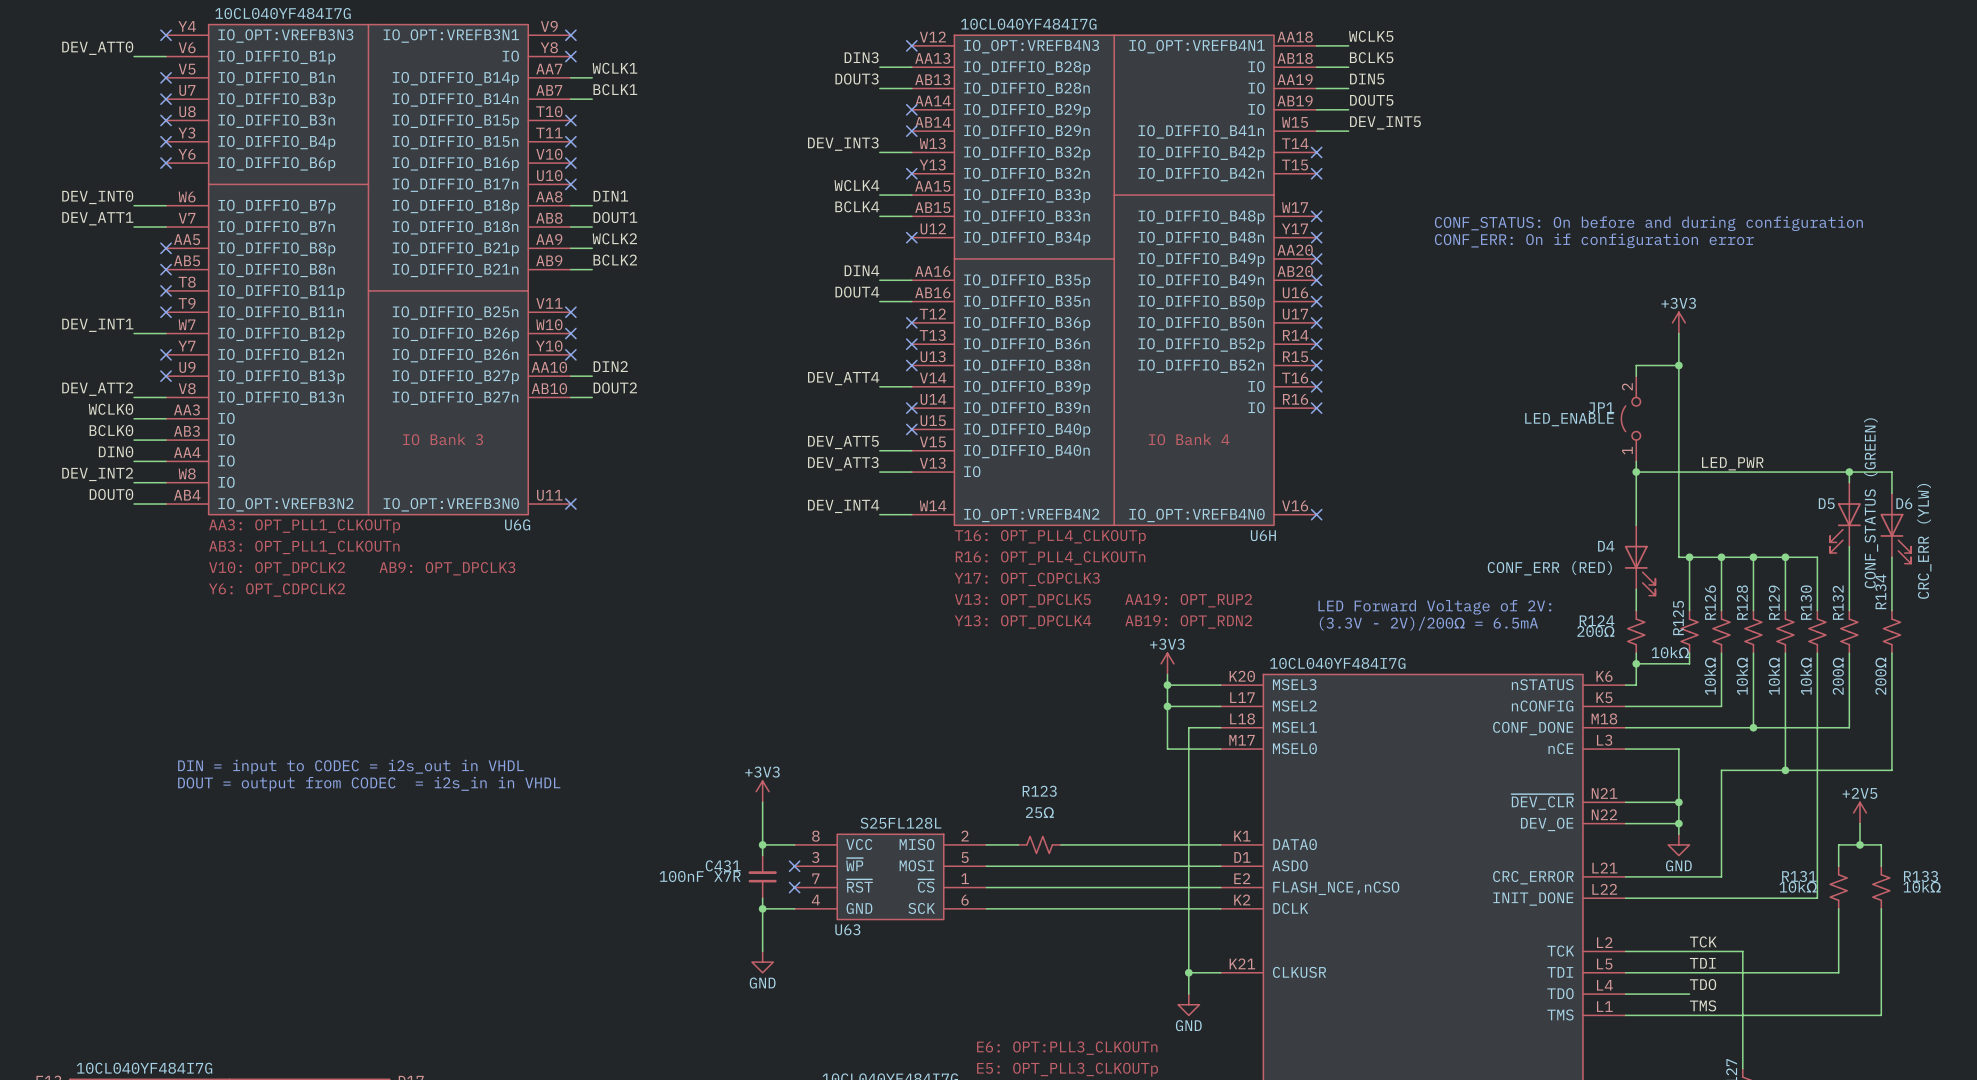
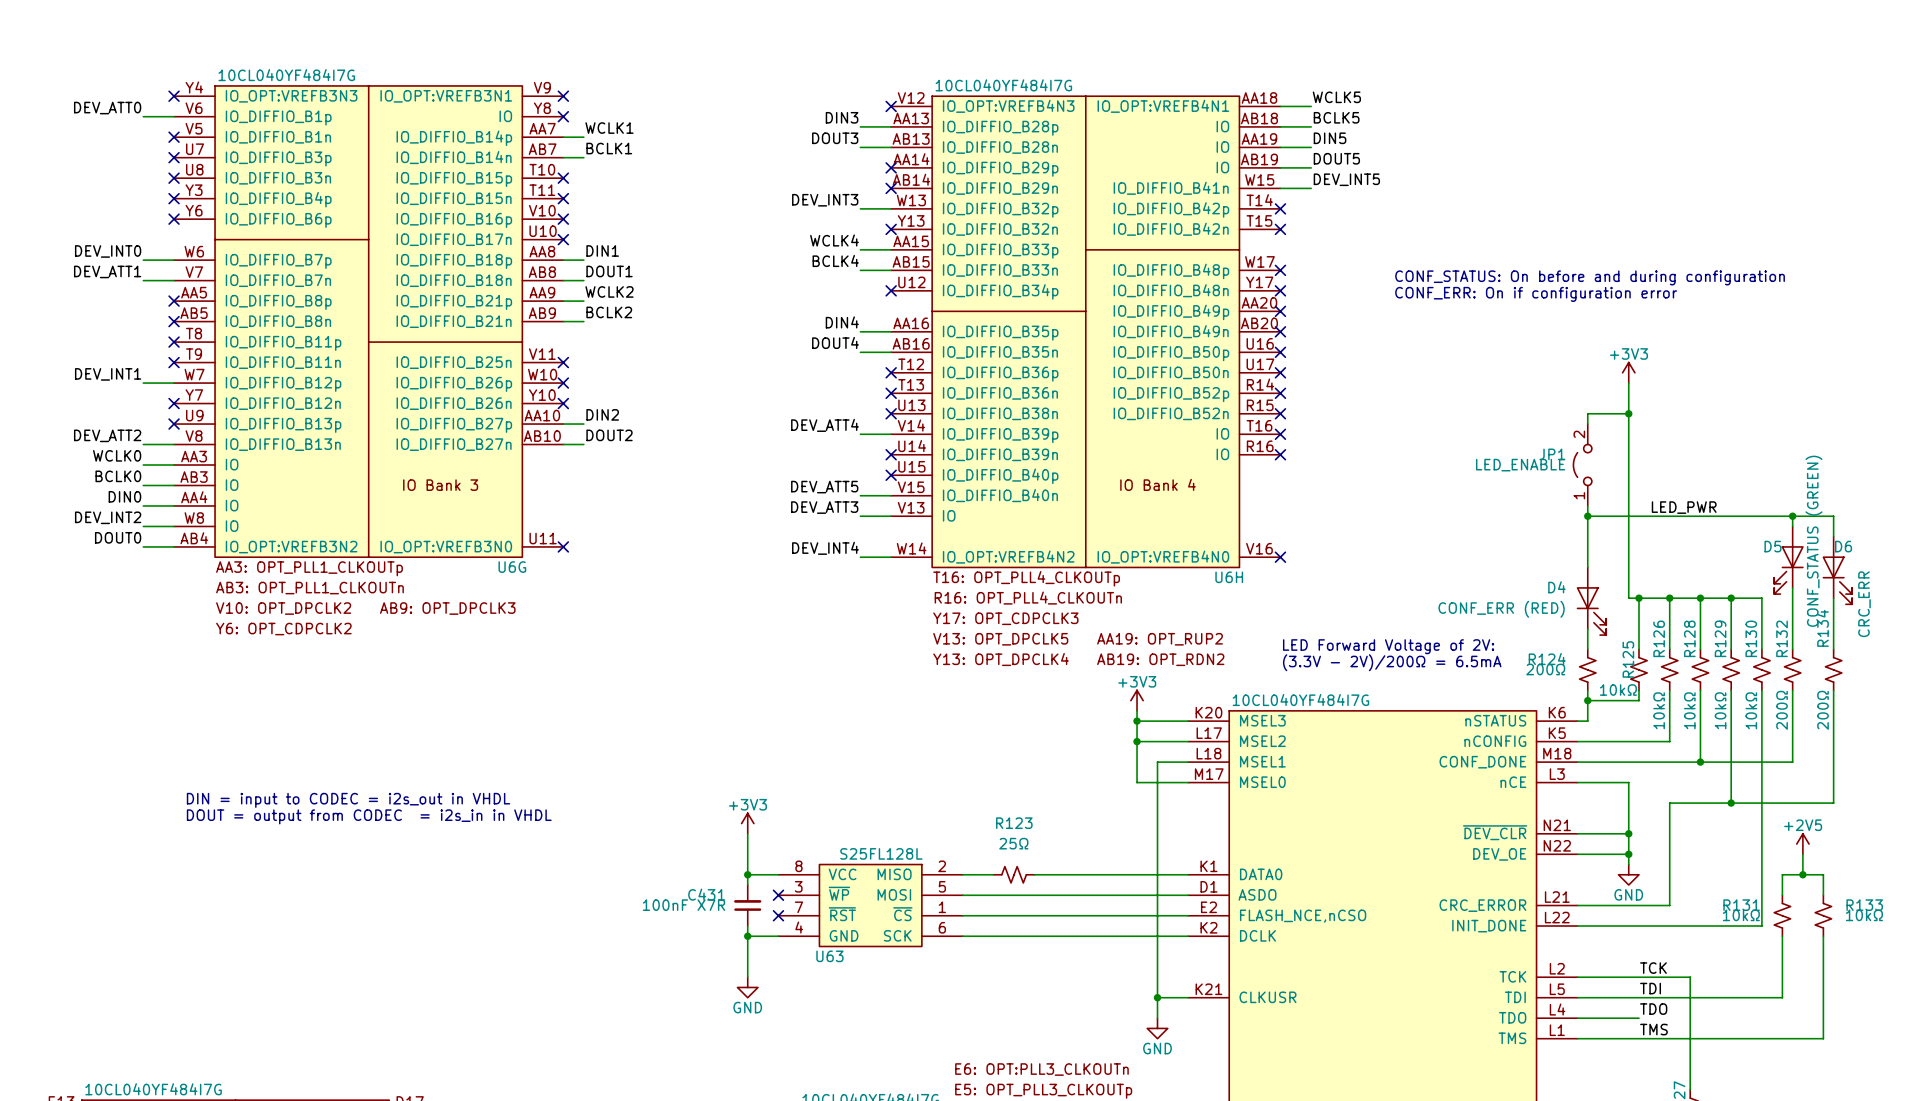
D6 value: CRC_ERR (YLW) (1924, 541) -> CRC_ERR (1864, 604)

